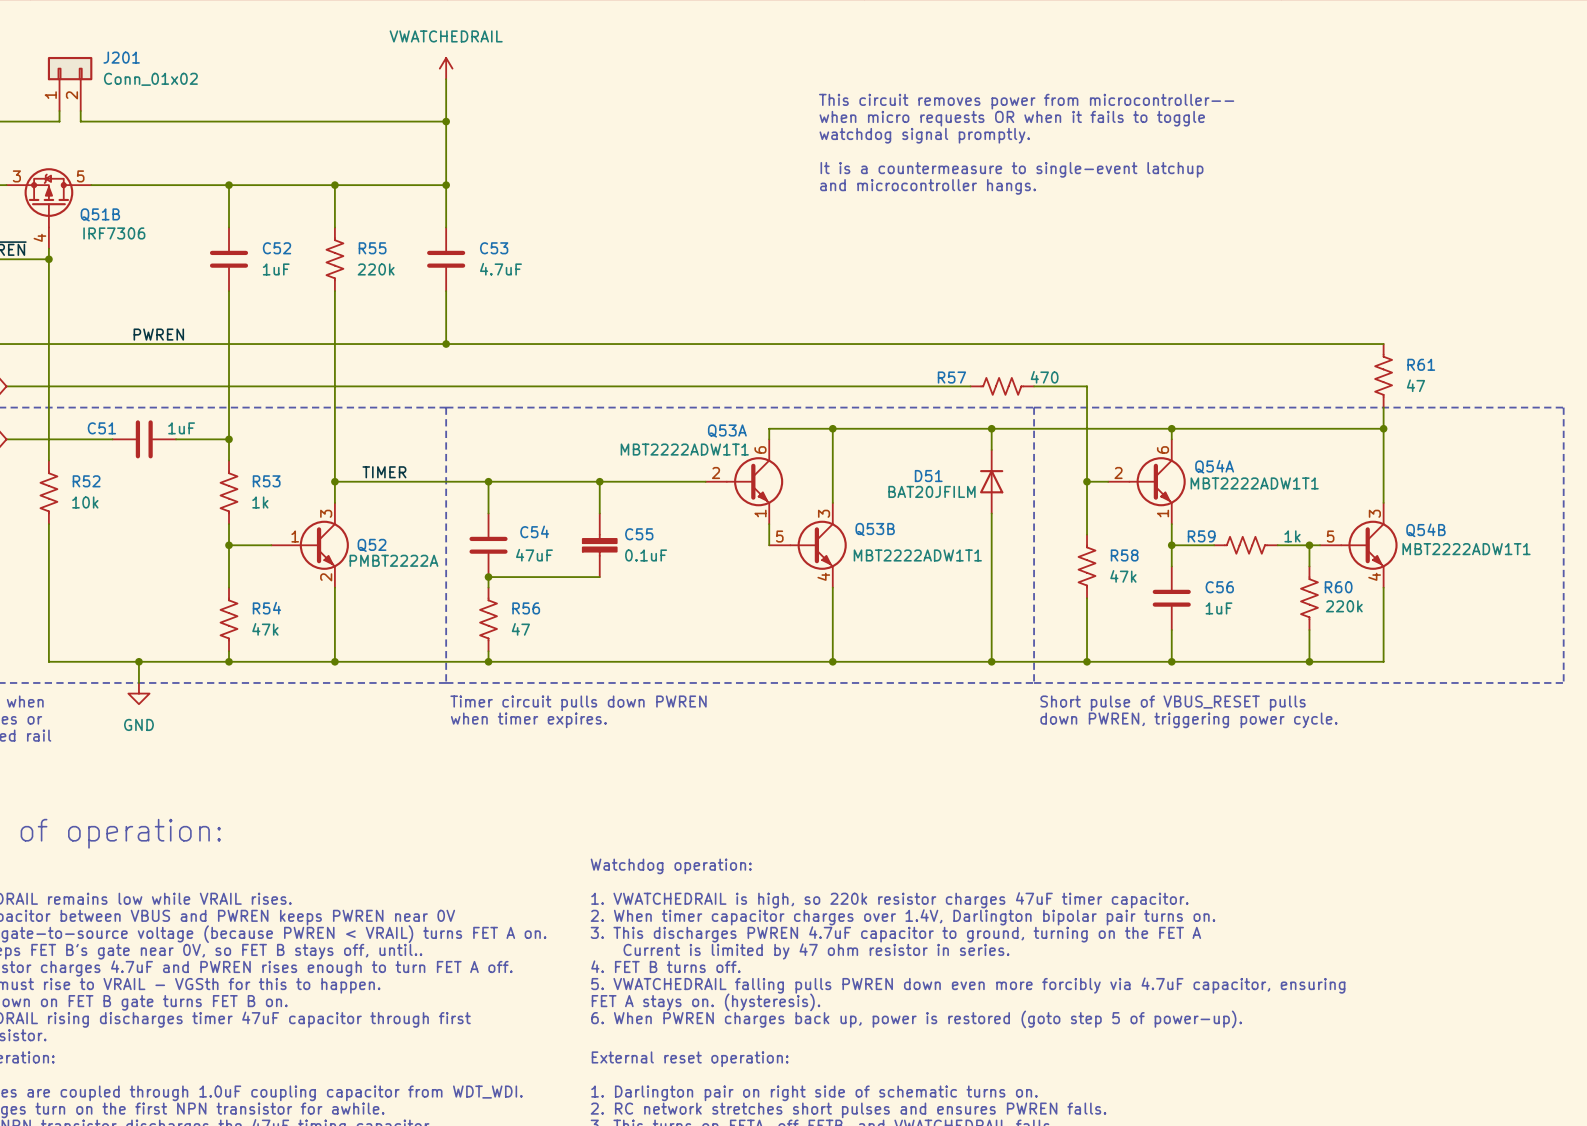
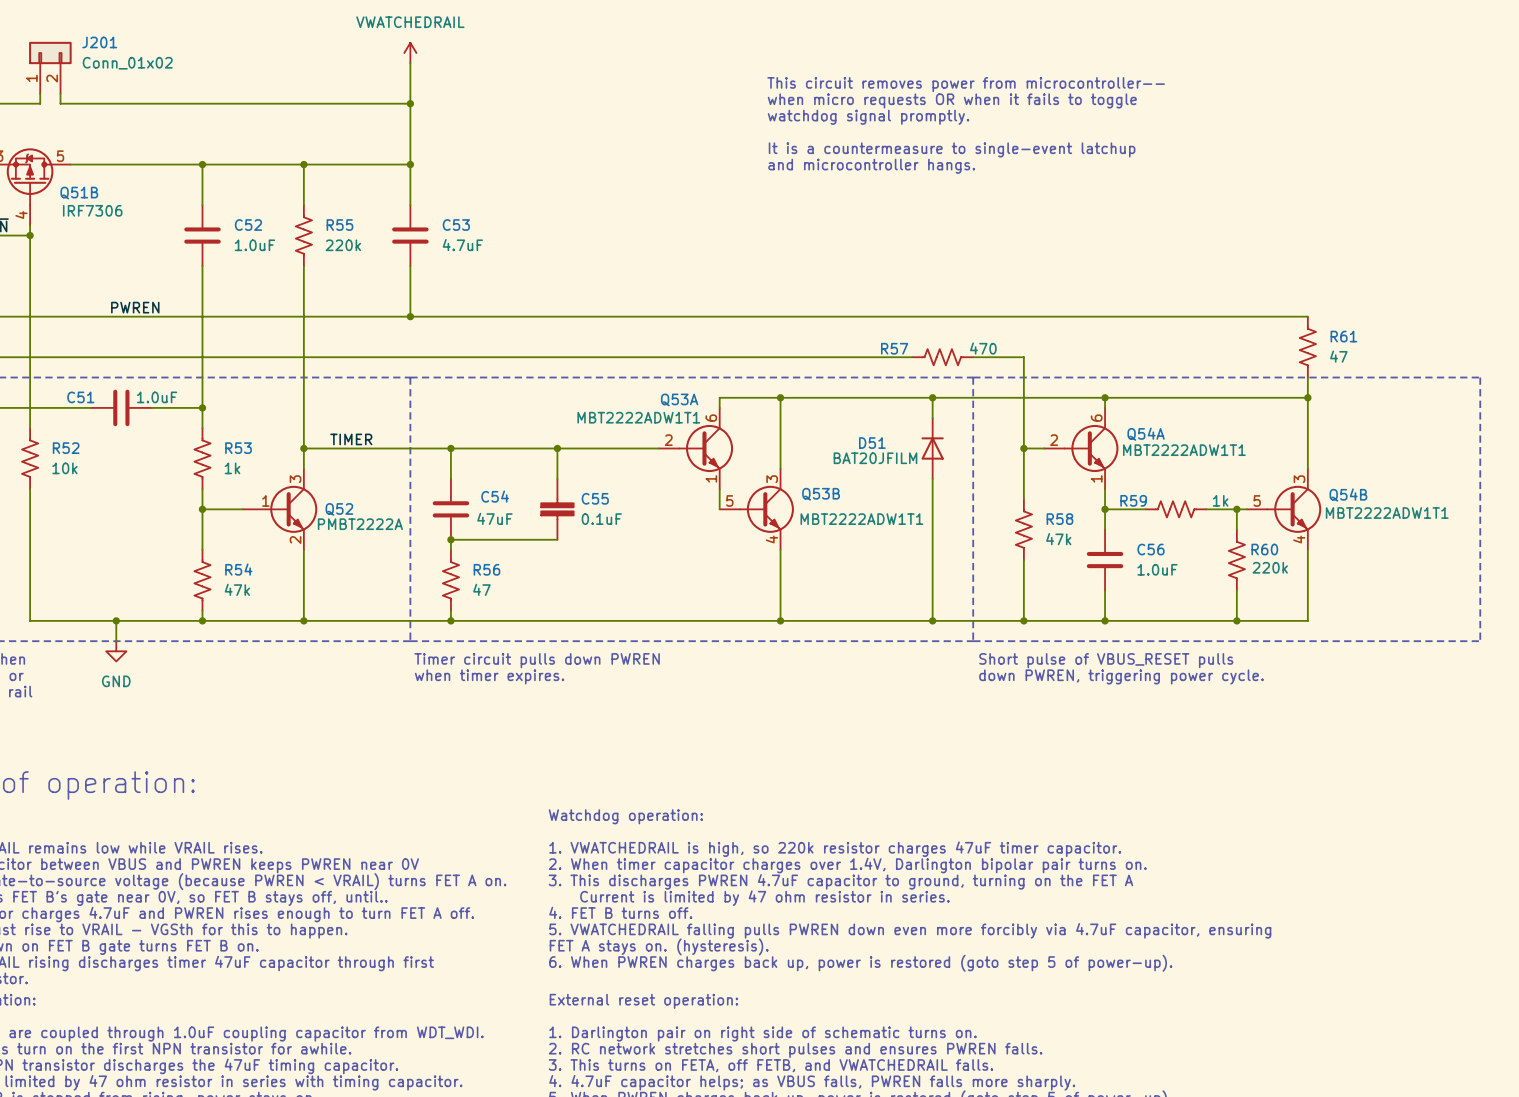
C52 value: 1uF (276, 269) -> 1.0uF (254, 245)
C51 value: 1uF (181, 428) -> 1.0uF (157, 397)
C56 value: 1uF (1218, 608) -> 1.0uF (1157, 569)

